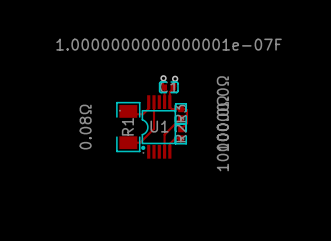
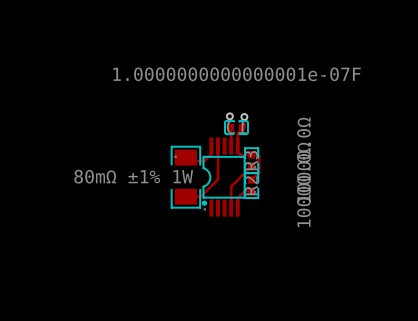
R1 name: R1 (127, 126) -> none
U1 name: U1 (159, 126) -> none
R1 value: 0.08Ω (85, 127) -> 80mΩ ±1% 1W (133, 176)

